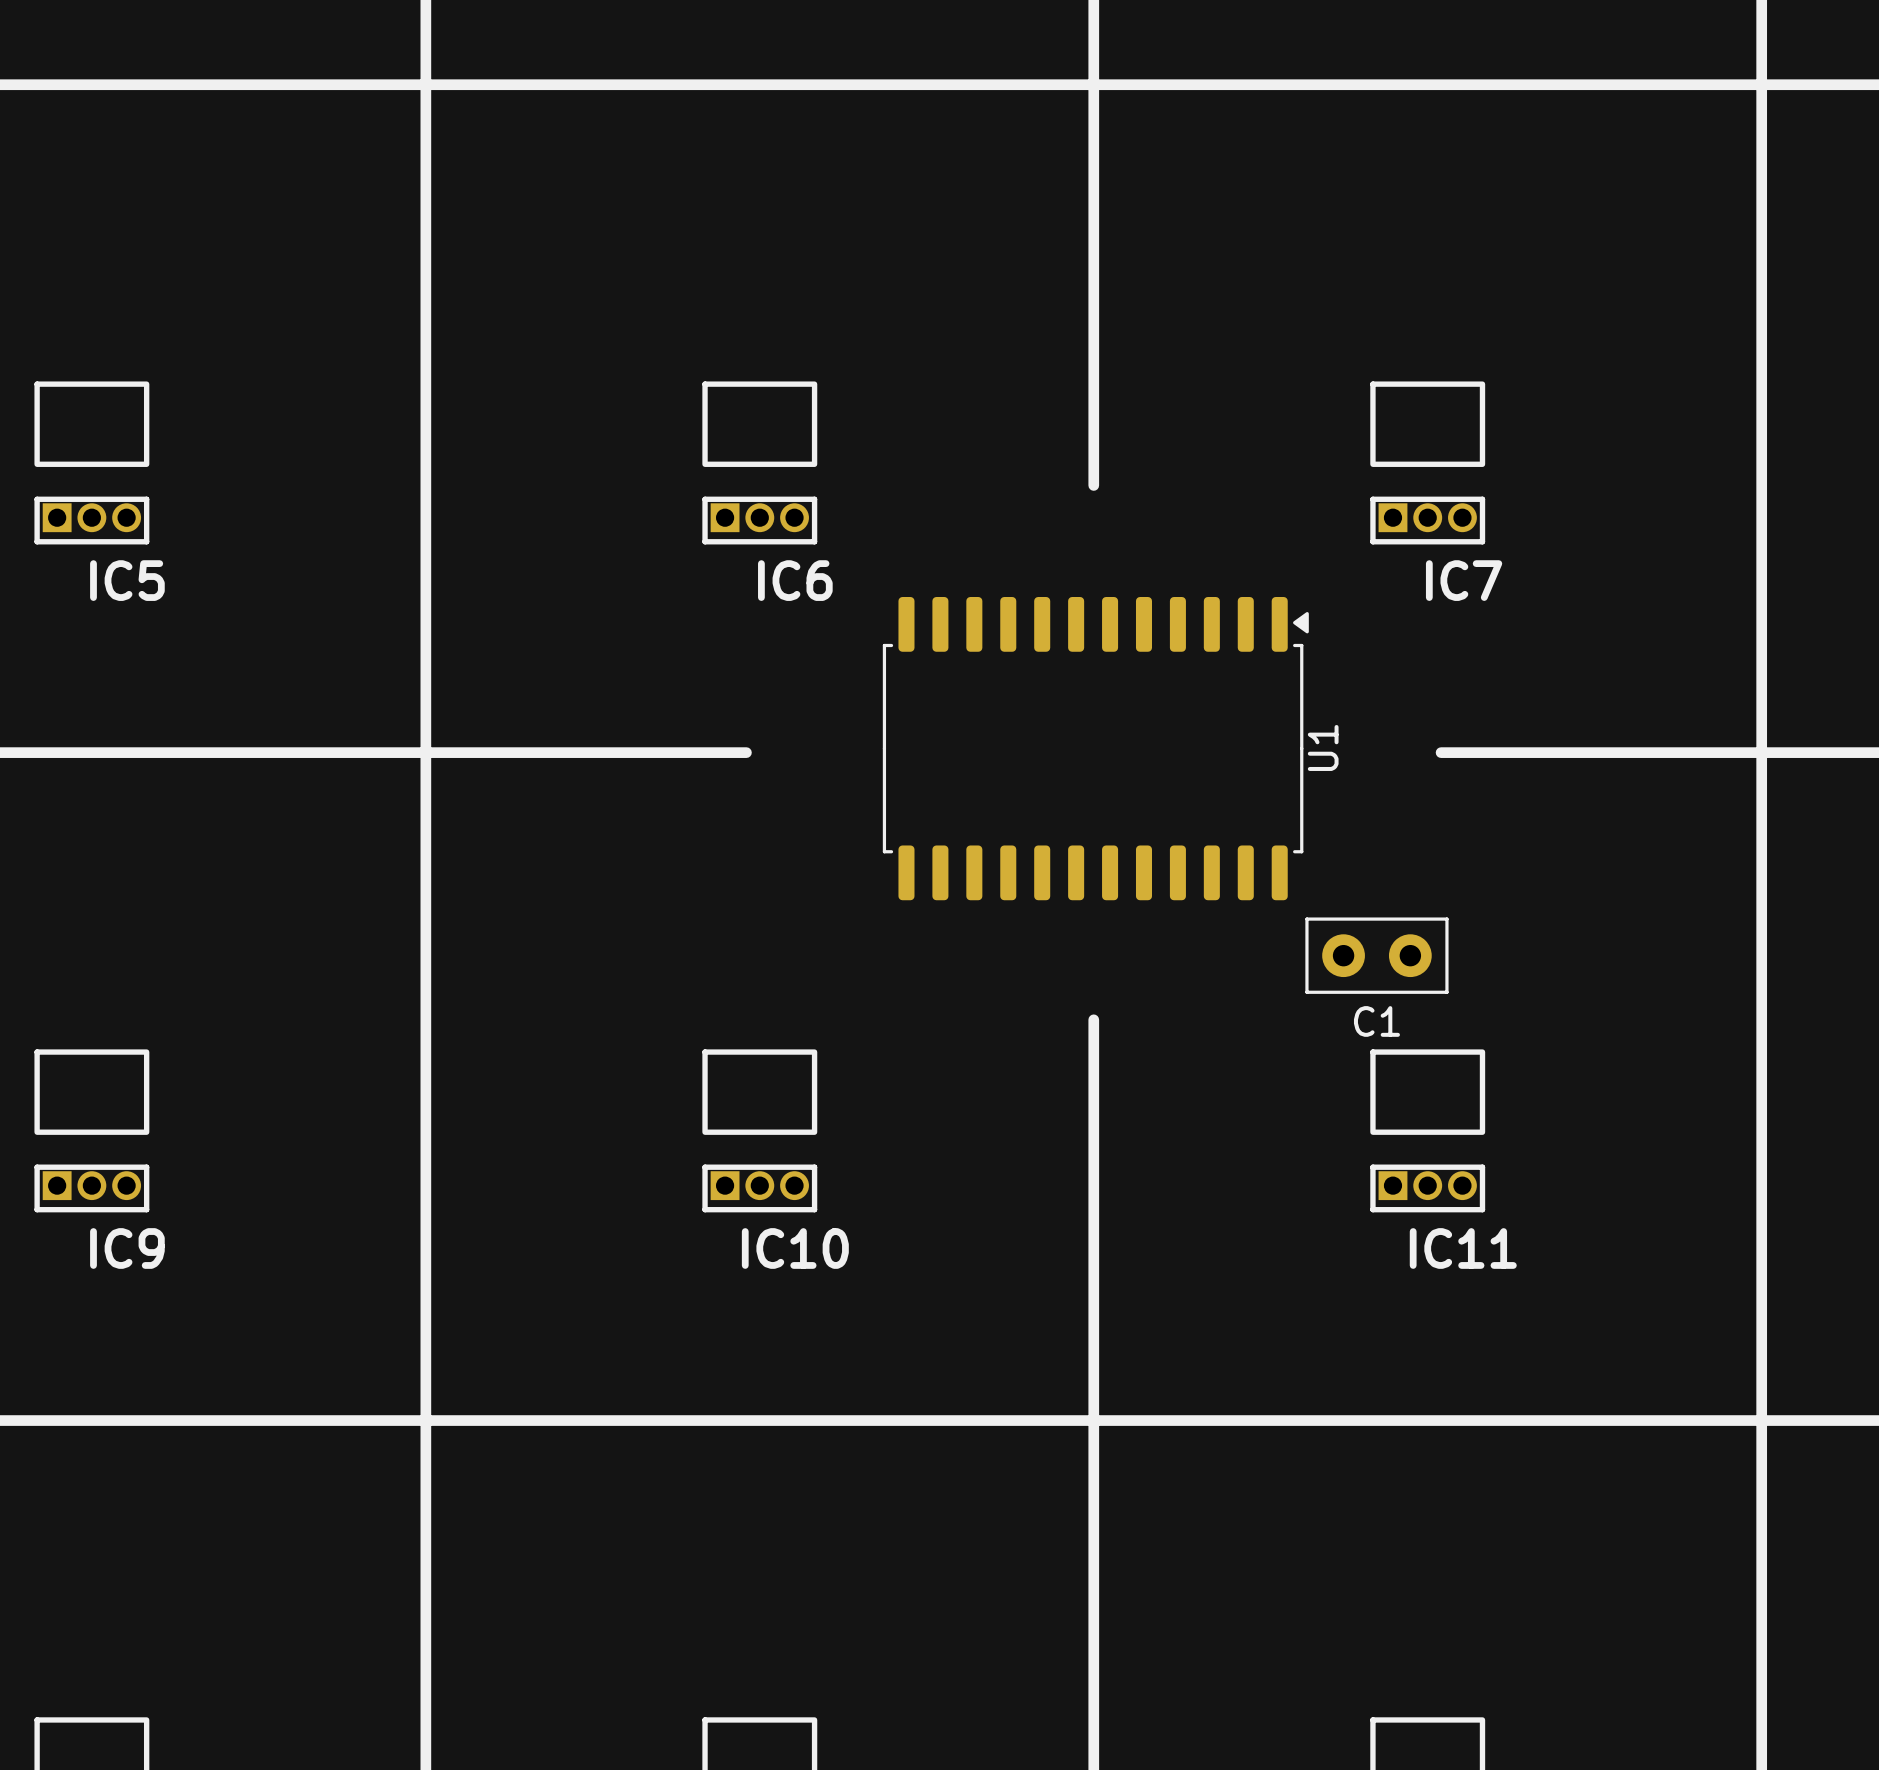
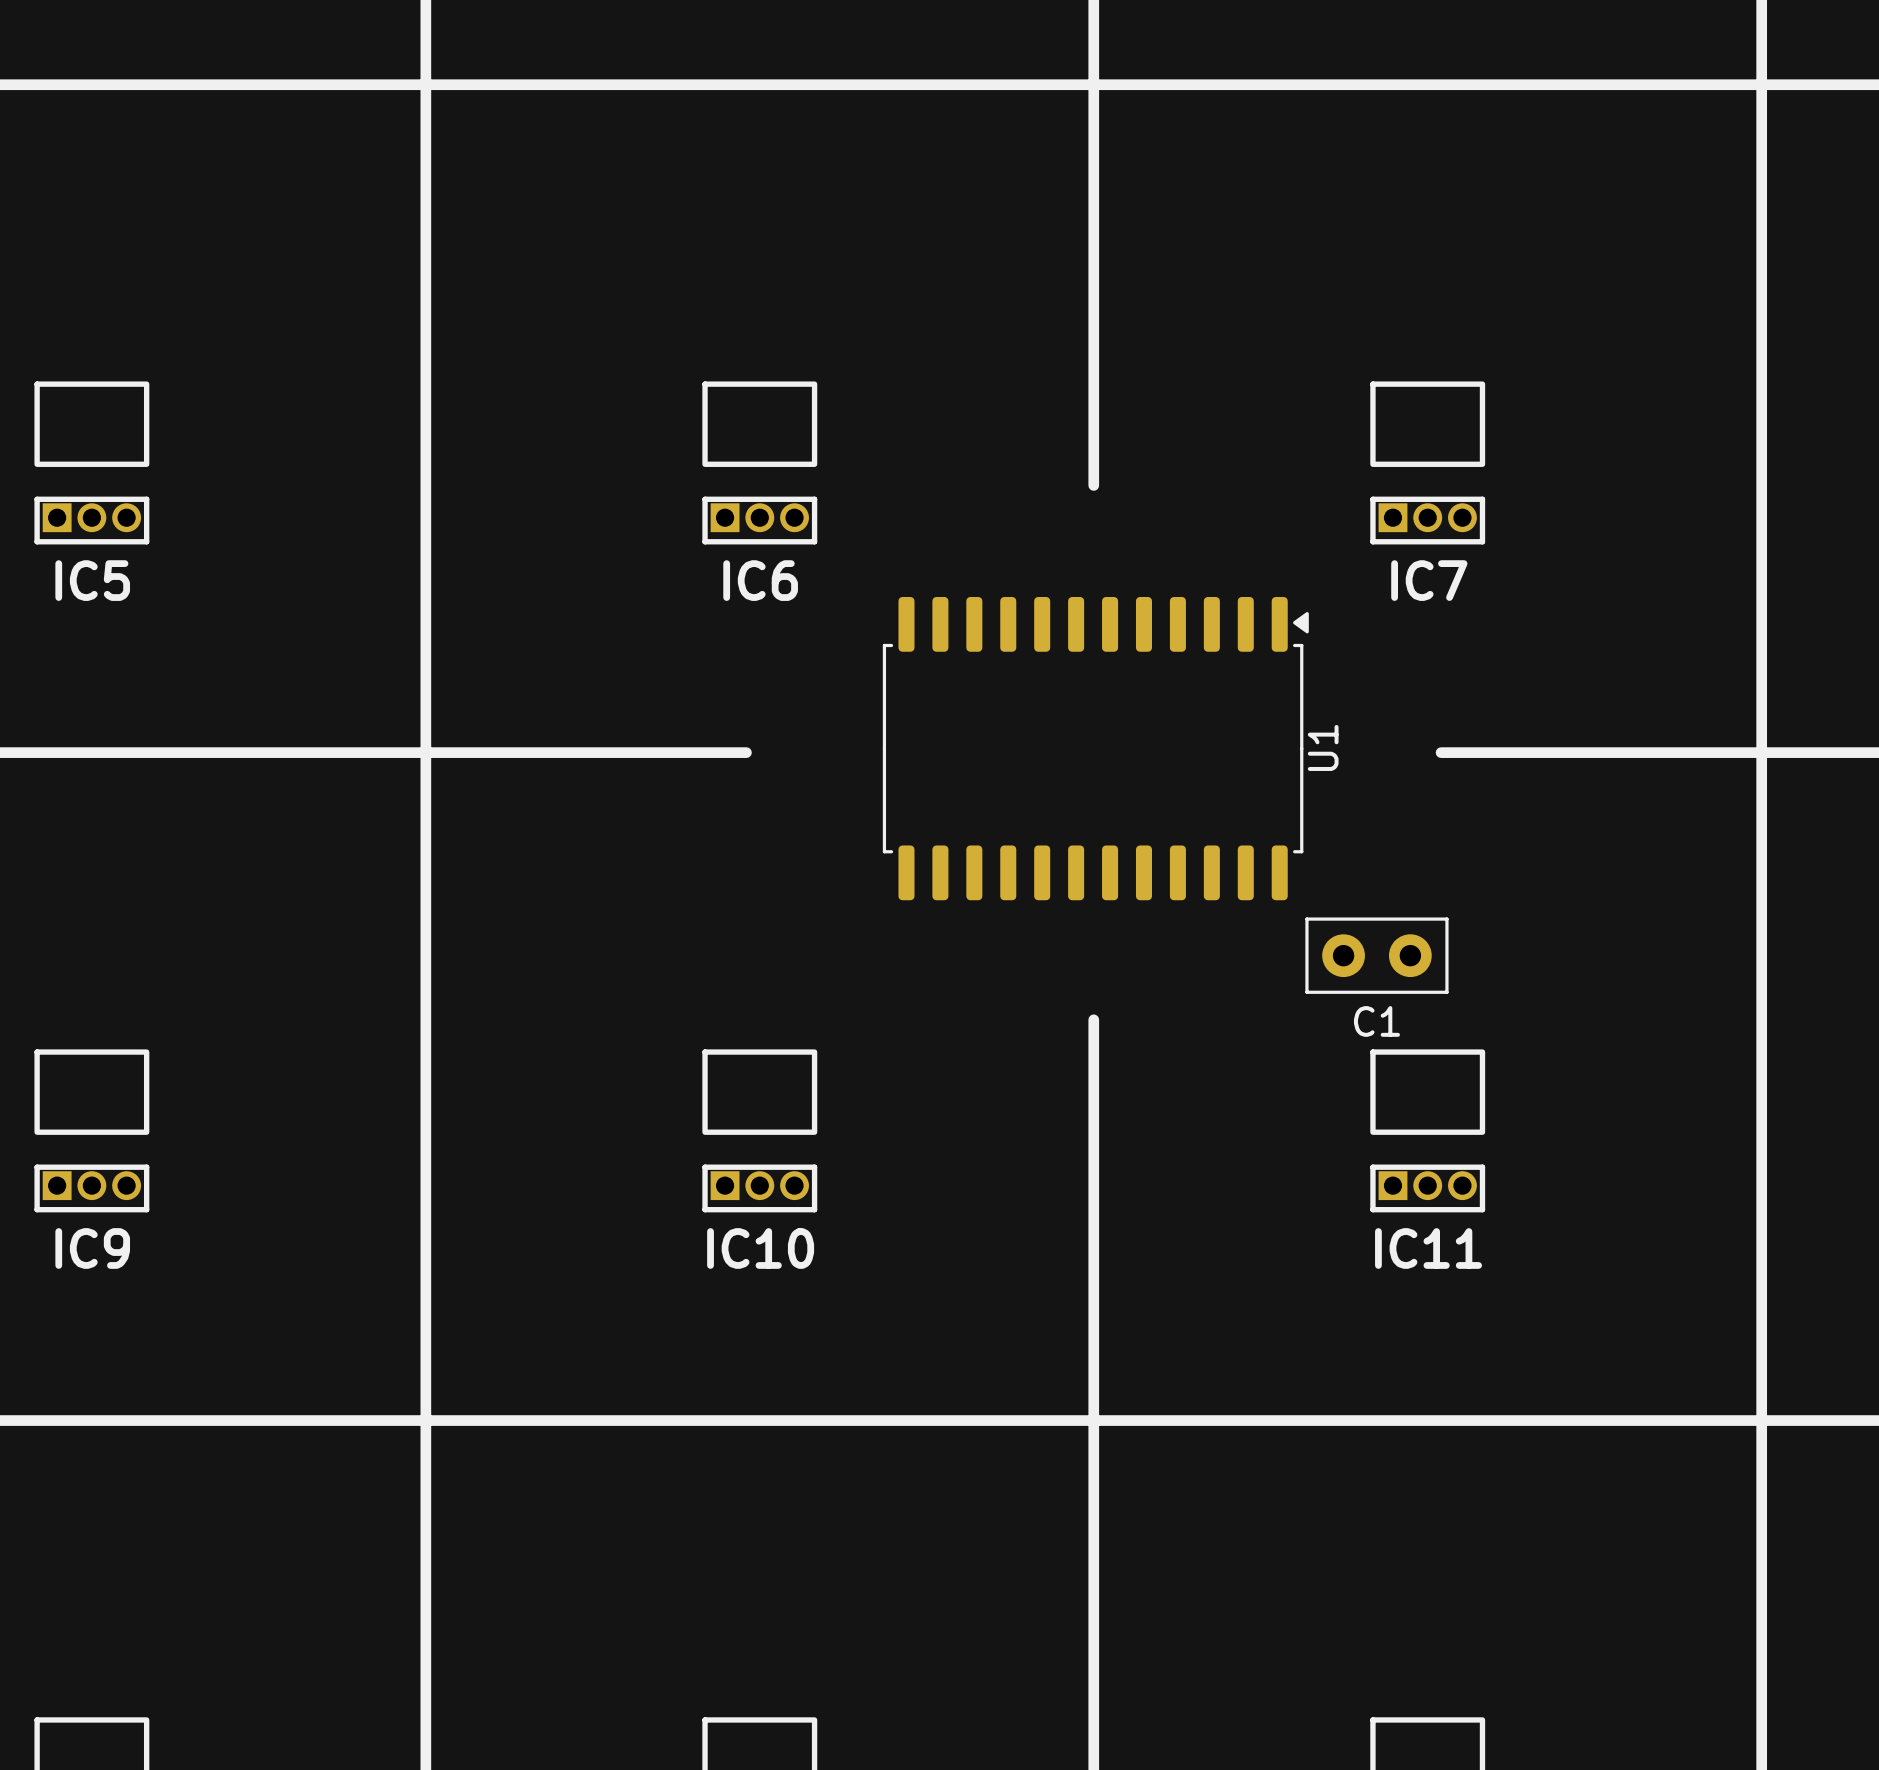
IC5 name position: IC5 (127, 580) -> IC5 (92, 580)
IC6 name position: IC6 (795, 580) -> IC6 (760, 580)
IC7 name position: IC7 (1464, 580) -> IC7 (1429, 580)
IC9 name position: IC9 (127, 1248) -> IC9 (92, 1248)
IC10 name position: IC10 (795, 1248) -> IC10 (760, 1248)
IC11 name position: IC11 (1463, 1248) -> IC11 (1428, 1248)

